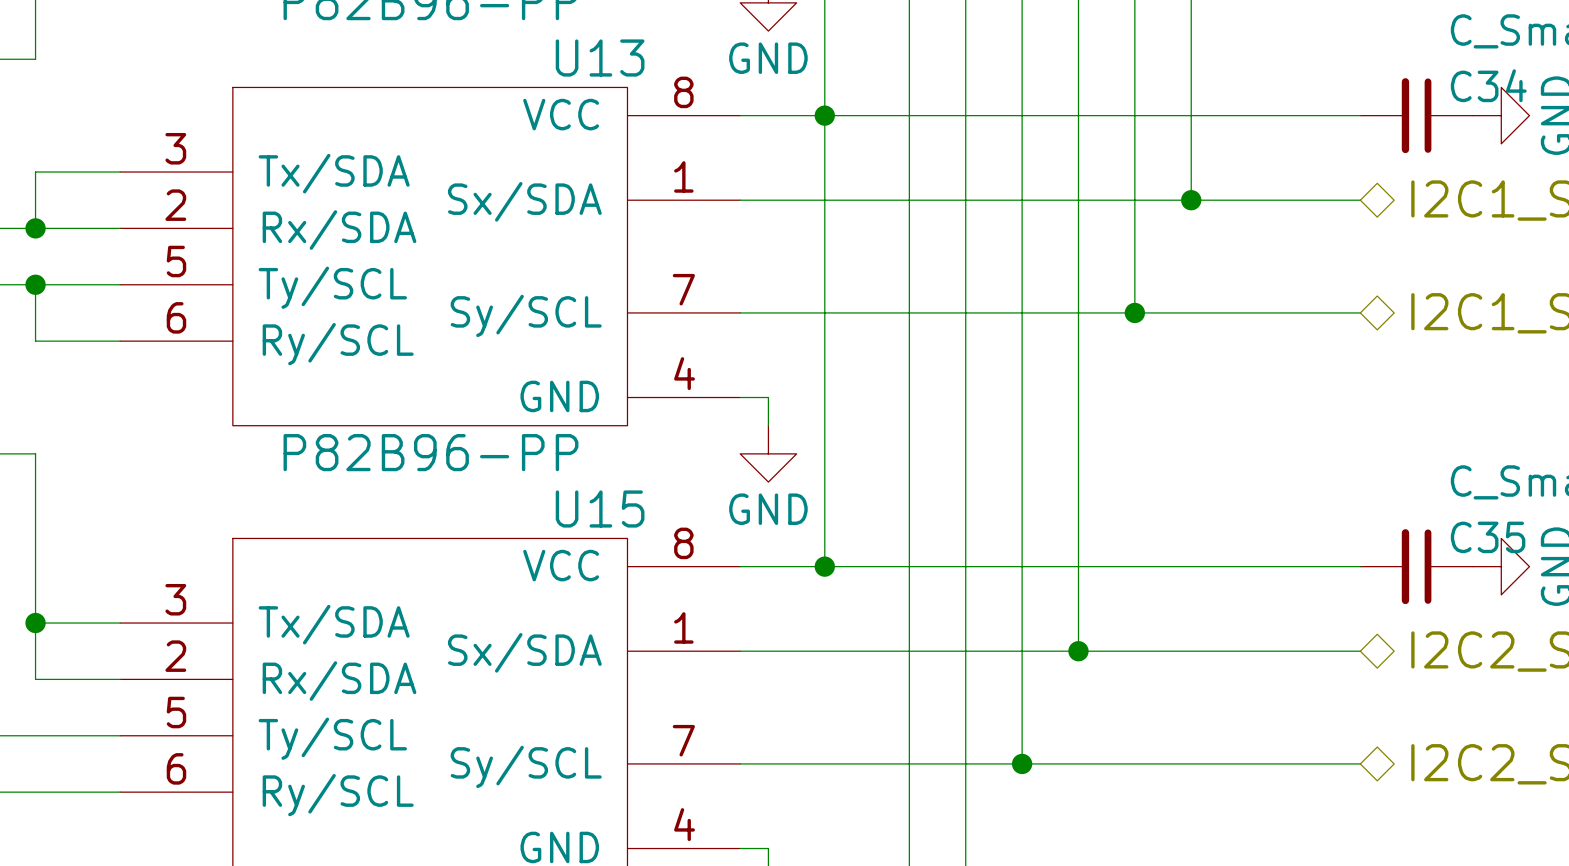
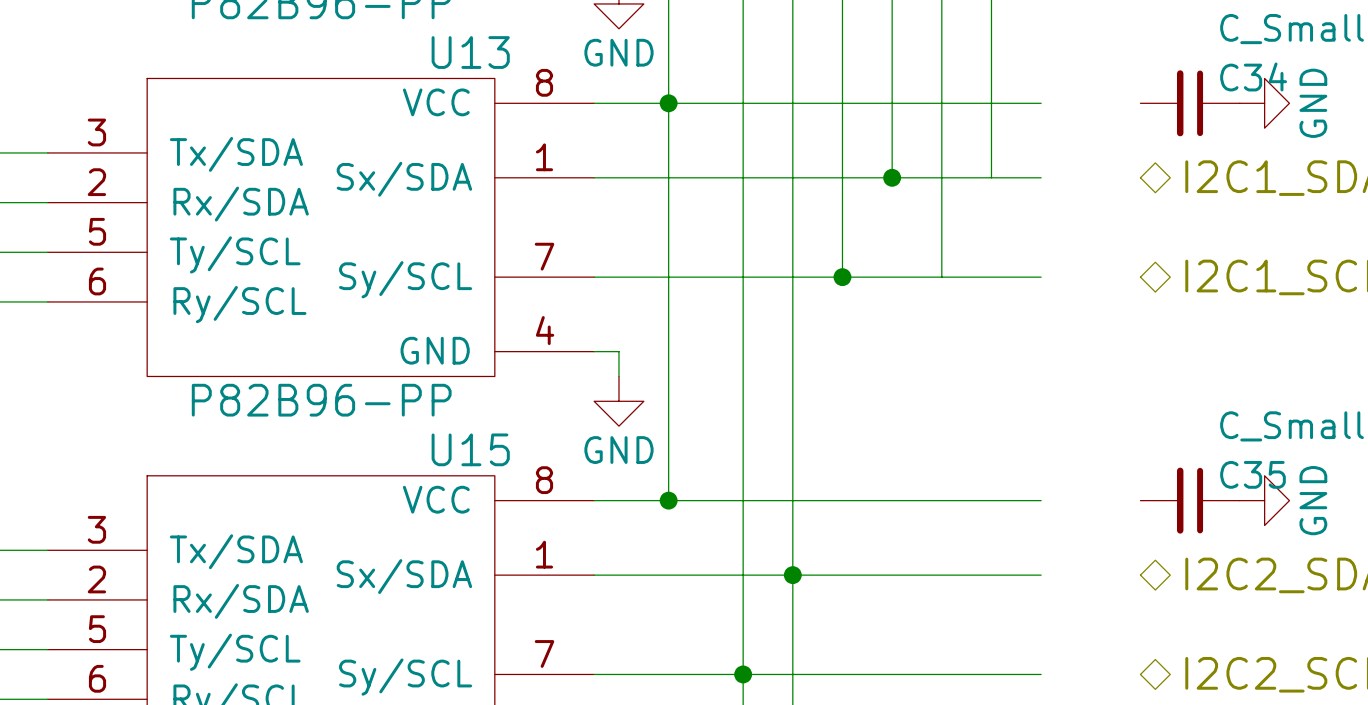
wire: (1247, 115) (1360, 115) -> none
wire: (1078, 200) (1078, 651) -> none
junction: none -> (892, 177)
junction: (1191, 200) -> none
wire: (1247, 200) (1360, 200) -> none
wire: (1022, 312) (1022, 763) -> none
junction: none -> (842, 277)
junction: (1134, 312) -> none
wire: (1247, 312) (1360, 312) -> none
wire: (1247, 566) (1360, 566) -> none
junction: none -> (792, 575)
junction: (1078, 651) -> none
wire: (1247, 651) (1360, 651) -> none
junction: none -> (743, 674)
junction: (1022, 763) -> none
wire: (1247, 763) (1360, 763) -> none

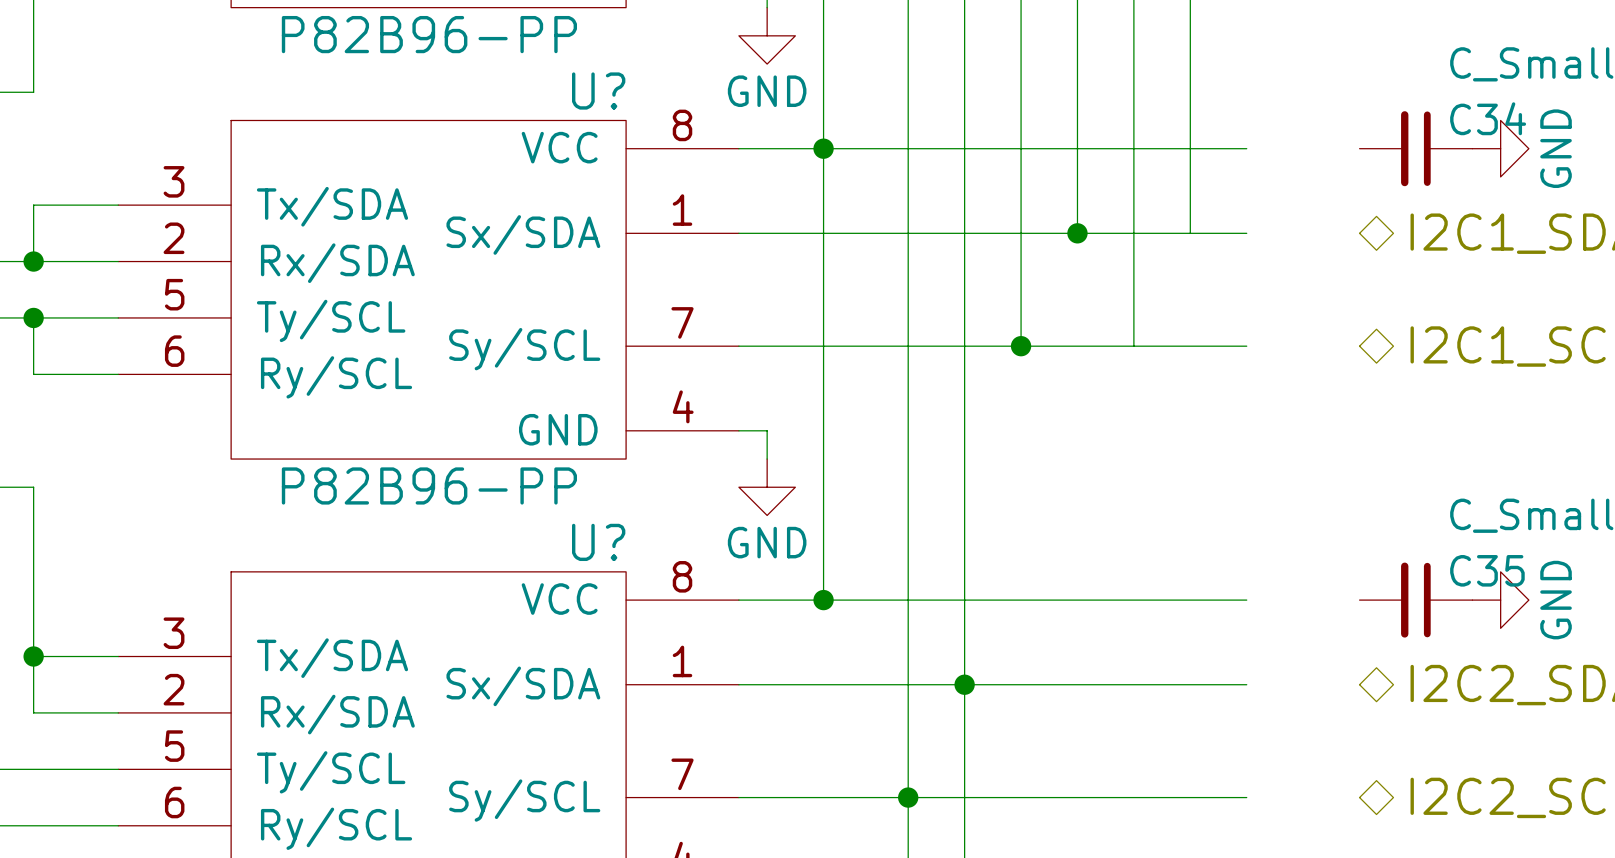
U13 name: U13 (470, 52) -> U? (598, 91)
U15 name: U15 (470, 449) -> U? (598, 542)

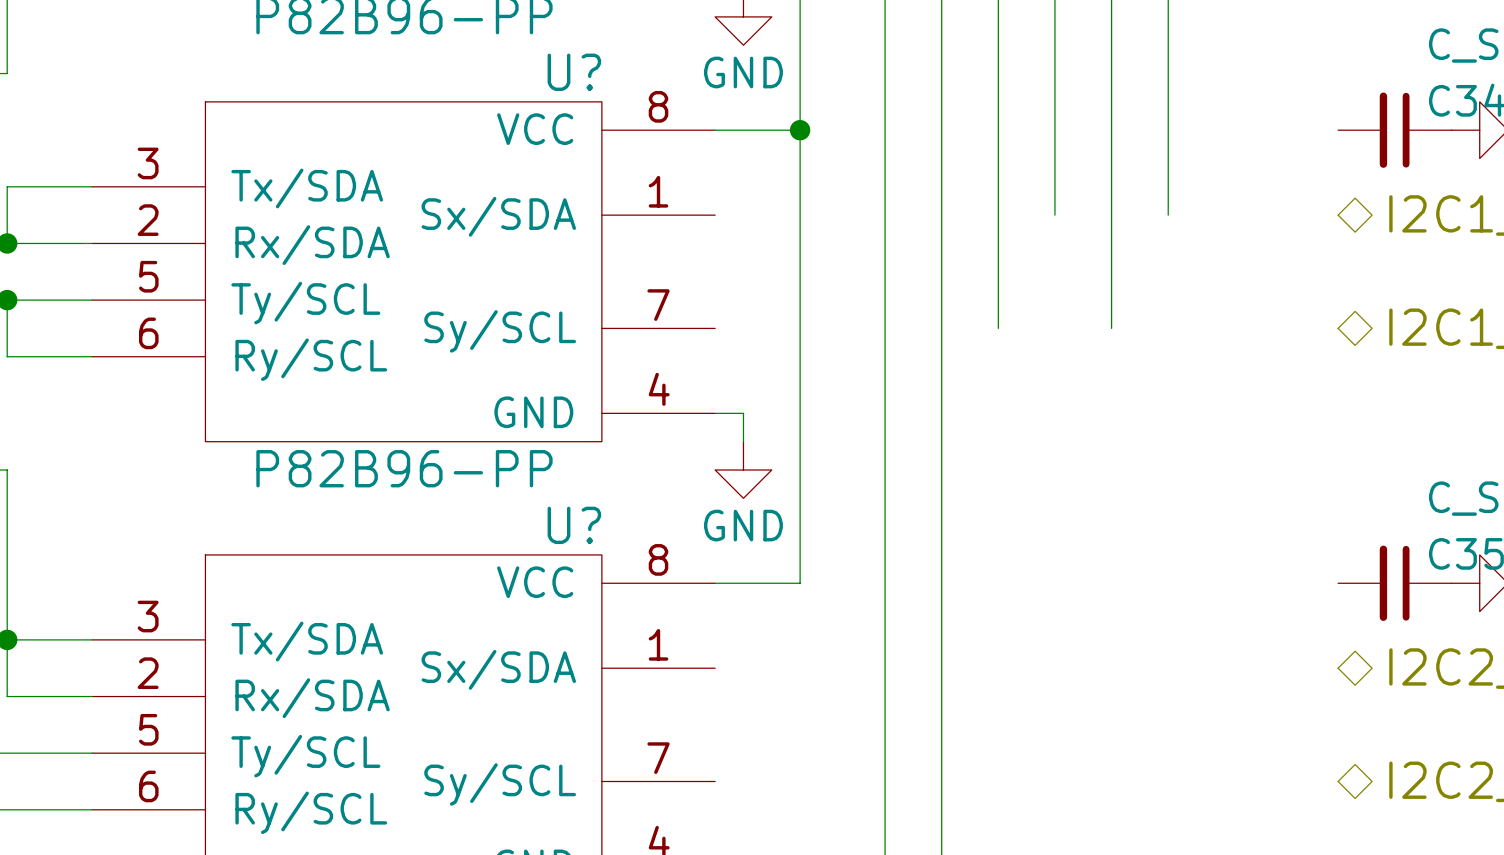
wire: (823, 148) (1246, 148) -> none
wire: (738, 233) (1246, 233) -> none
junction: (1077, 233) -> none
wire: (738, 346) (1246, 346) -> none
junction: (1021, 346) -> none
wire: (823, 600) (1246, 600) -> none
junction: (823, 600) -> none
wire: (738, 684) (1246, 684) -> none
junction: (964, 684) -> none
wire: (738, 797) (1246, 797) -> none
junction: (908, 797) -> none

